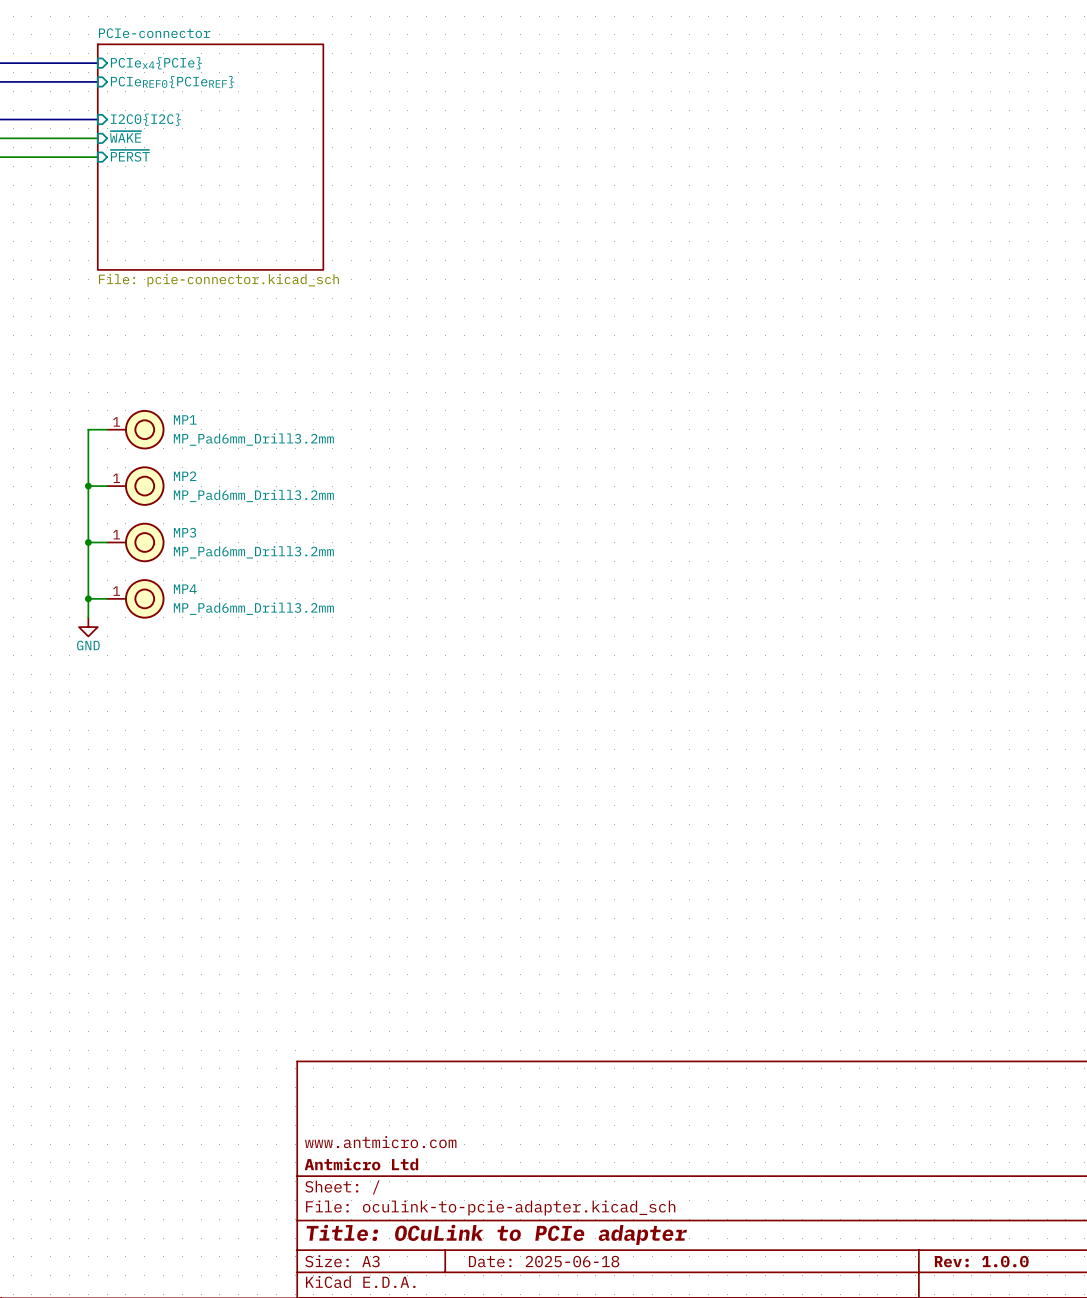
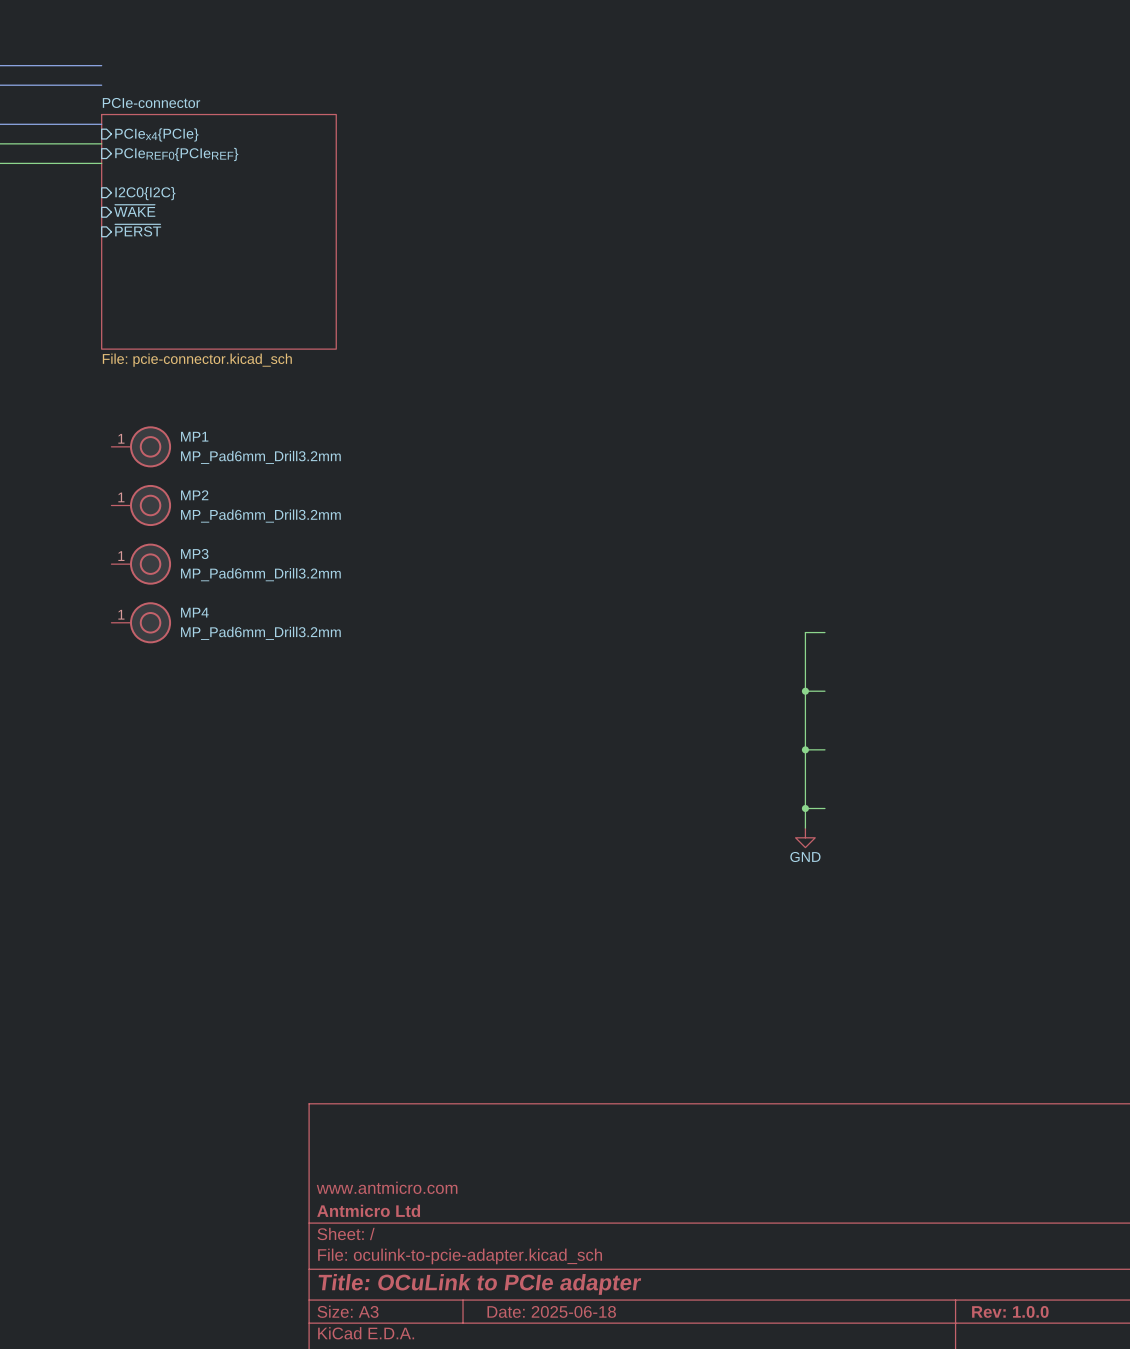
sheet pin position: PCIex4{PCIe} (156, 63) -> PCIex4{PCIe} (156, 134)
sheet pin position: PCIeREF0{PCIeREF} (172, 82) -> PCIeREF0{PCIeREF} (176, 154)
sheet pin position: I2C0{I2C} (145, 119) -> I2C0{I2C} (145, 193)
sheet pin position: ~{WAKE} (125, 136) -> ~{WAKE} (134, 210)
sheet pin position: ~{PERST} (130, 155) -> ~{PERST} (138, 230)
sheet PCIe-connector position: (210, 157) -> (218, 231)
wire: (107, 429) (88, 429) (88, 617) -> none
wire: (88, 486) (107, 486) -> none
junction: (88, 486) -> none
wire: (88, 542) (107, 542) -> none
junction: (88, 542) -> none
wire: (88, 598) (107, 598) -> none
junction: (88, 598) -> none
wire: none -> (824, 632) (805, 632) (805, 828)
power symbol: GND (88, 627) -> none
wire: none -> (805, 691) (824, 691)
junction: none -> (805, 691)
wire: none -> (805, 749) (824, 749)
junction: none -> (805, 749)
wire: none -> (805, 808) (824, 808)
junction: none -> (805, 808)
power symbol: none -> GND (805, 837)

